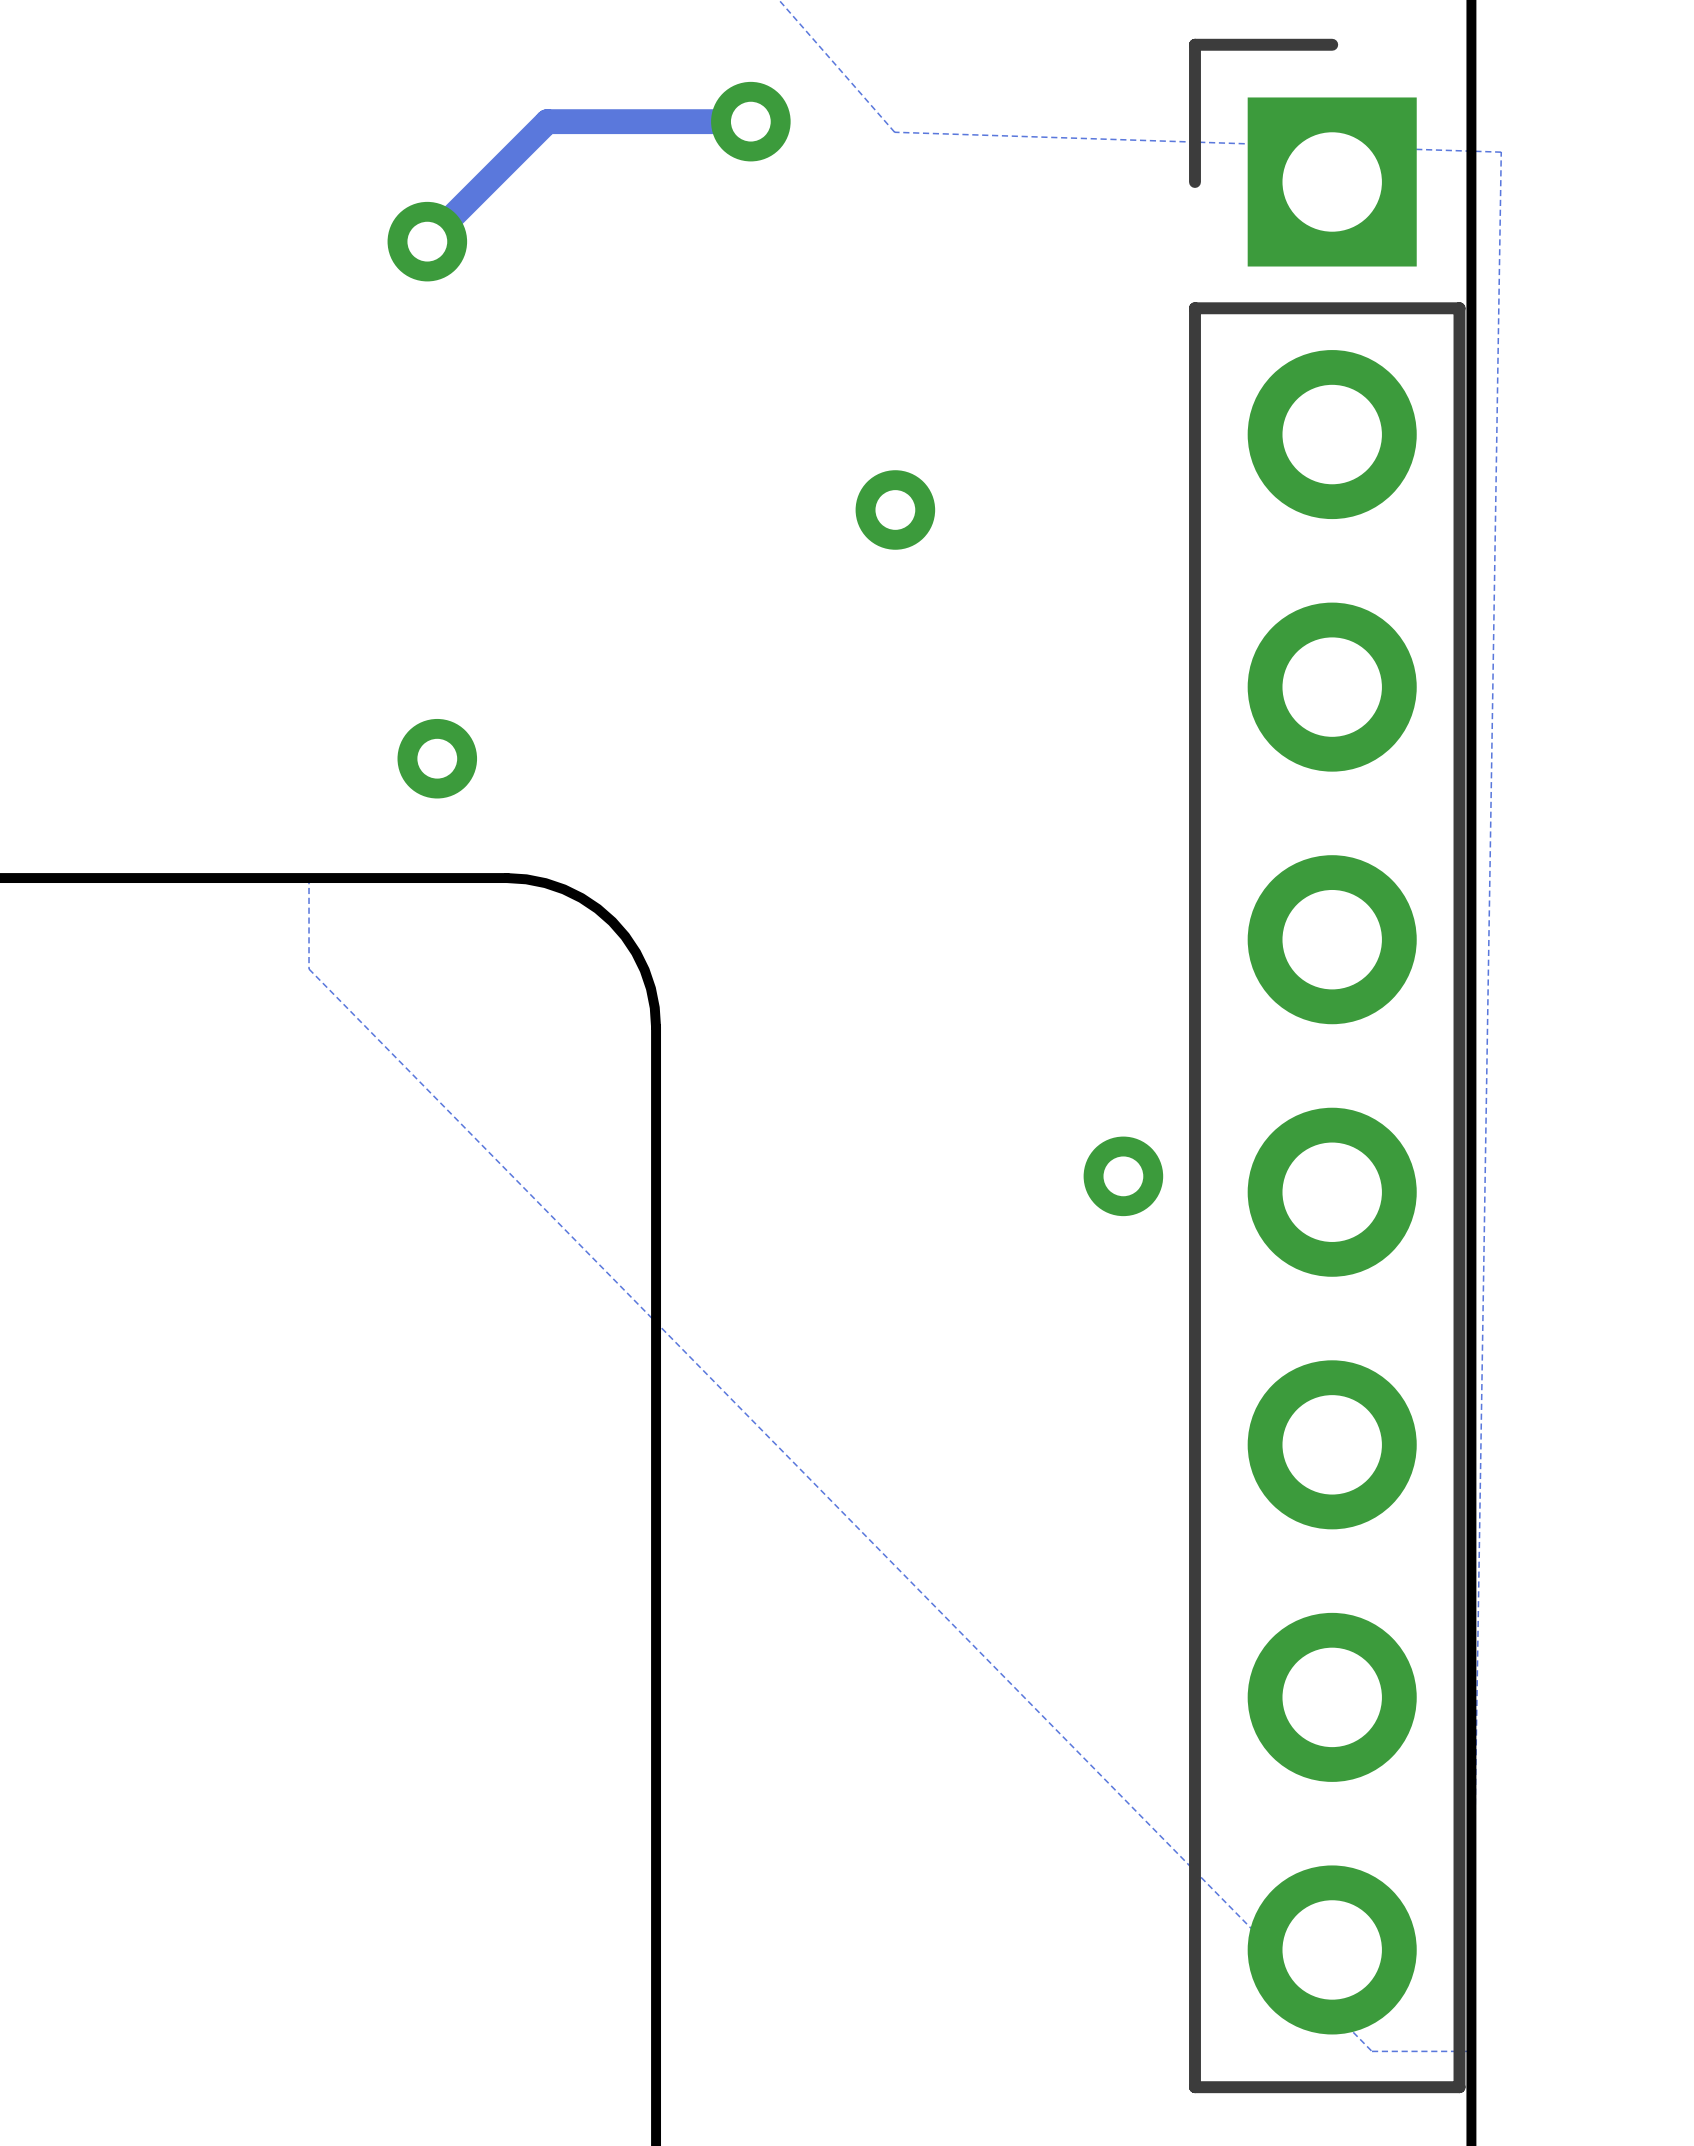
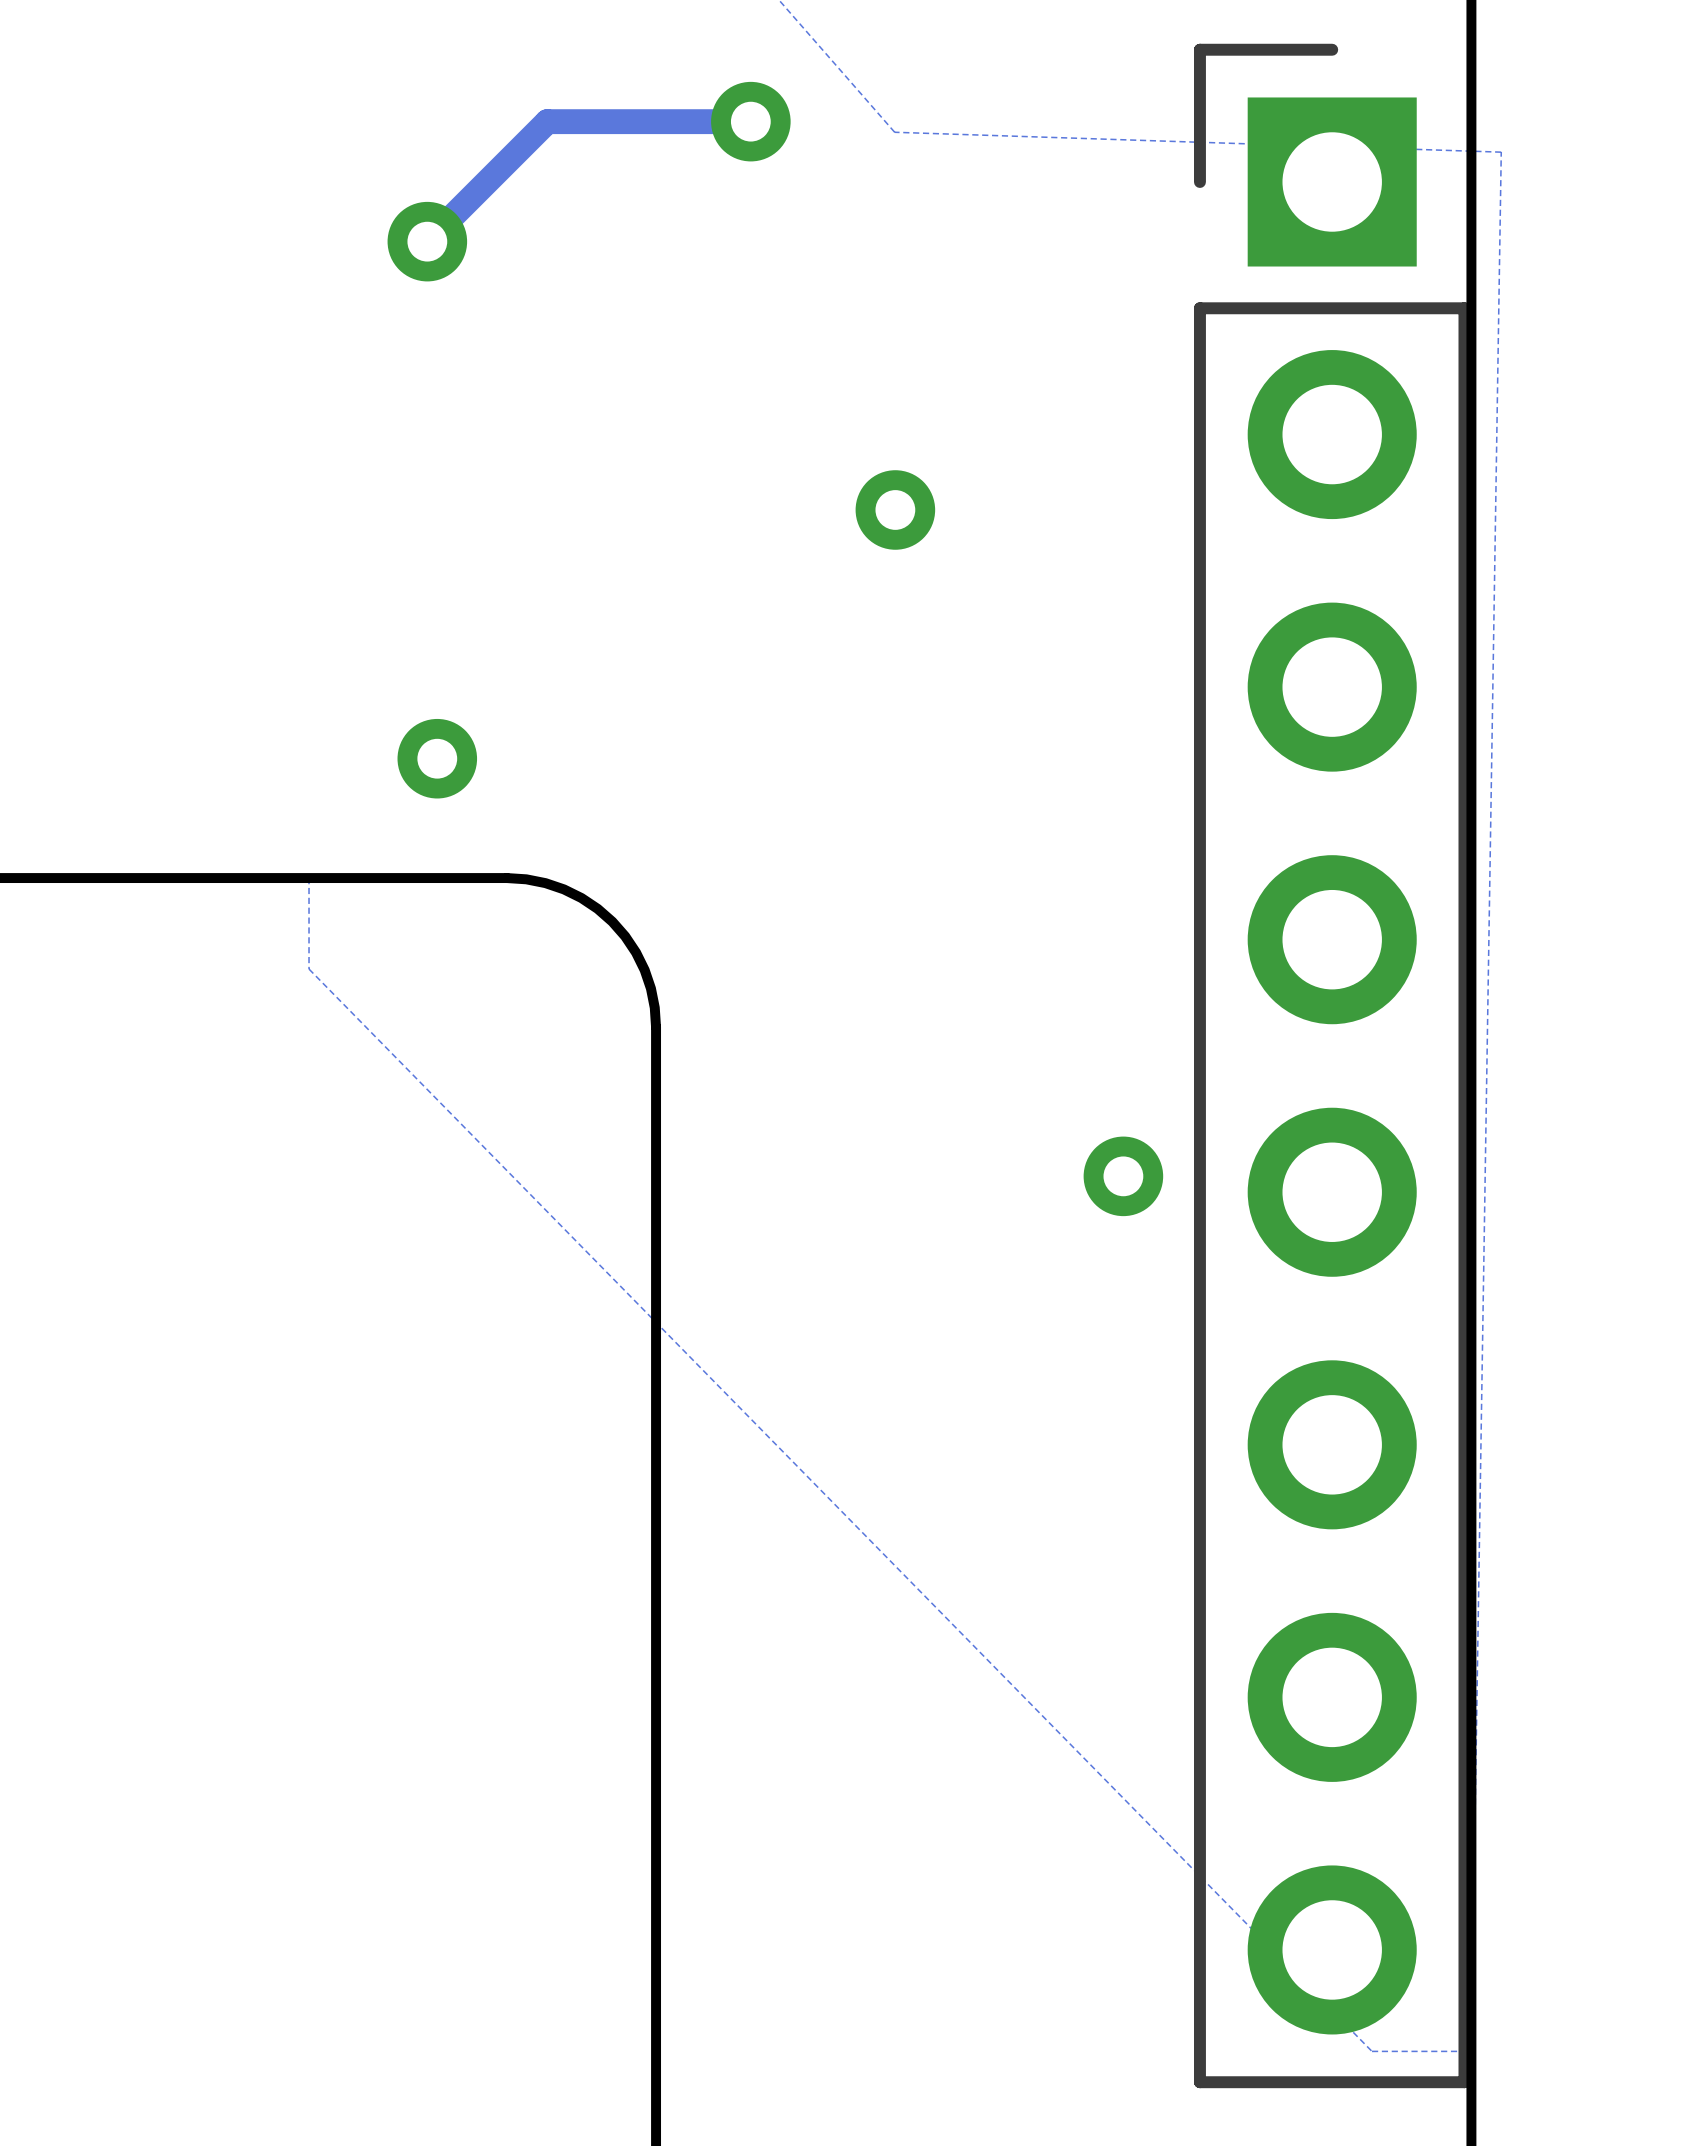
part footprint: [1189, 38, 1466, 2094] -> [1194, 43, 1471, 2089]

